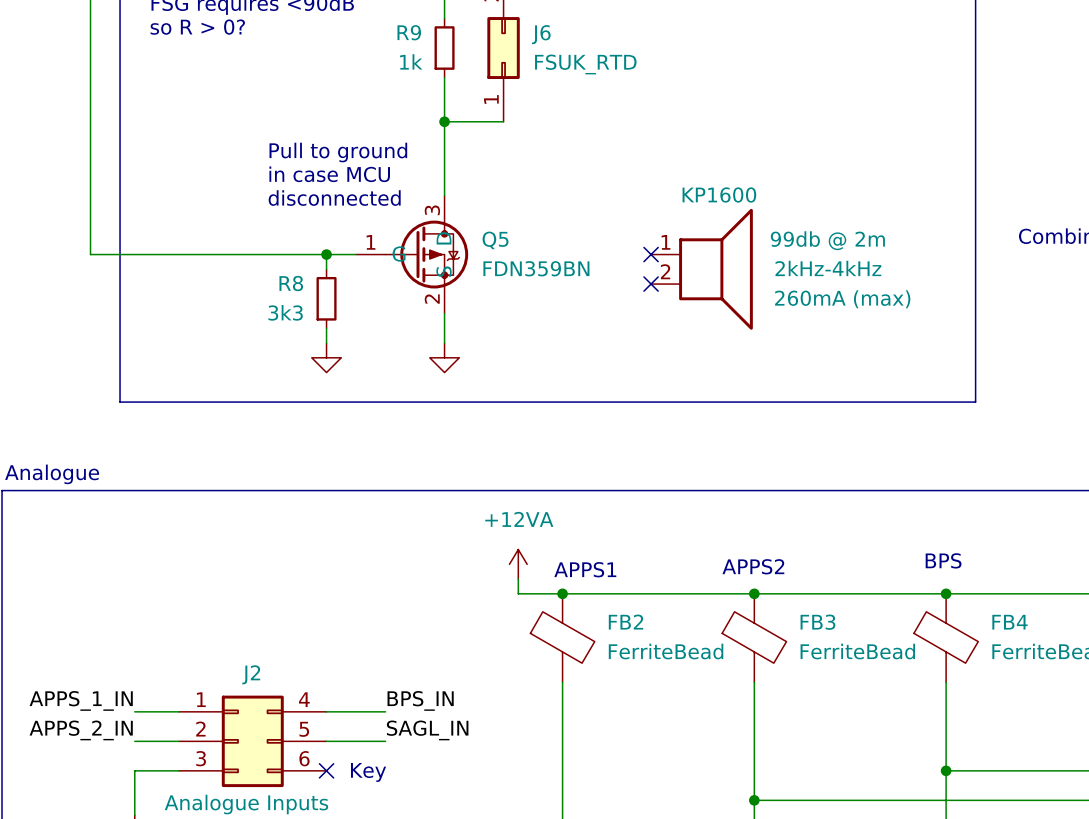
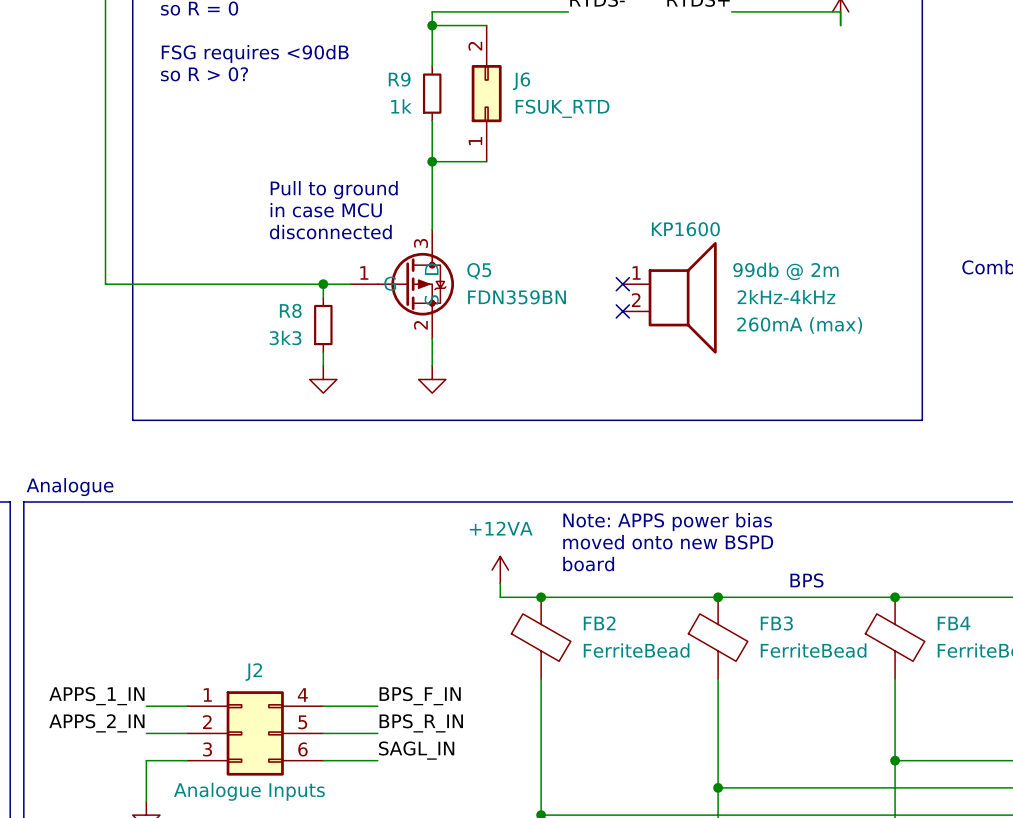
text: none -> Note: APPS power bias (667, 522)
text: none -> moved onto new BSPD (668, 542)
text: none -> board (588, 564)
text position: BPS (943, 560) -> BPS (806, 580)
text: APPS2 (753, 566) -> none
text: APPS1 (585, 569) -> none
label: BPS_IN (420, 700) -> BPS_F_IN (420, 696)
label: SAGL_IN (427, 730) -> BPS_R_IN (421, 723)
label: none -> SAGL_IN (416, 750)
wire: none -> (323, 760) (377, 760)
no-connect mark: (326, 770) -> none
text: Key (368, 772) -> none

